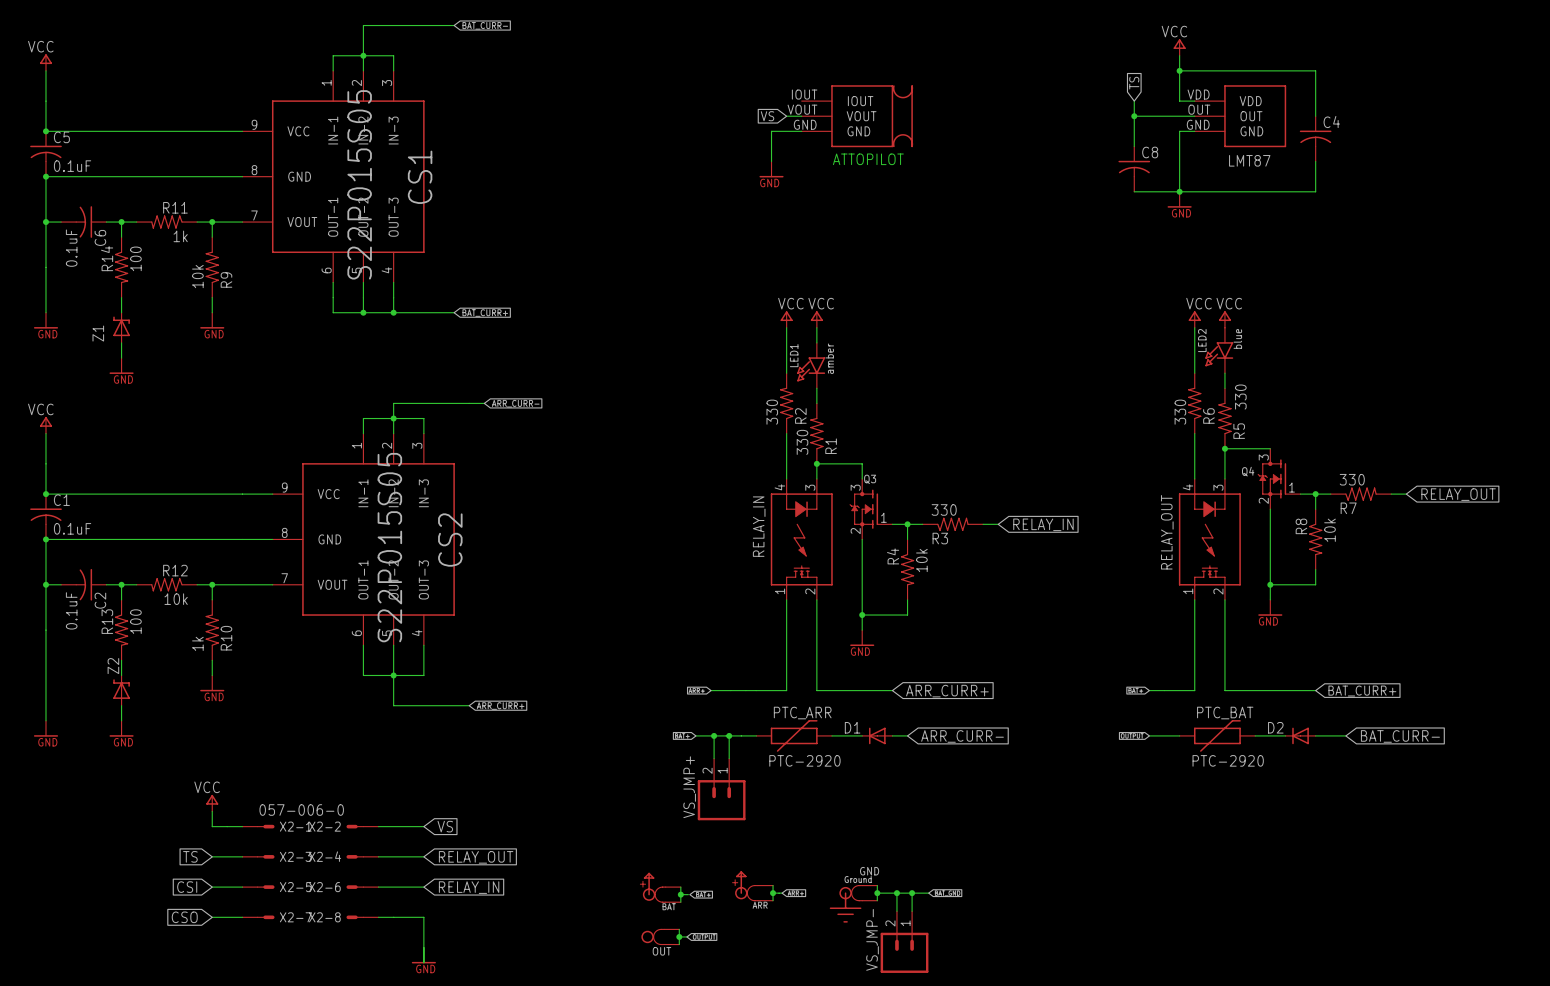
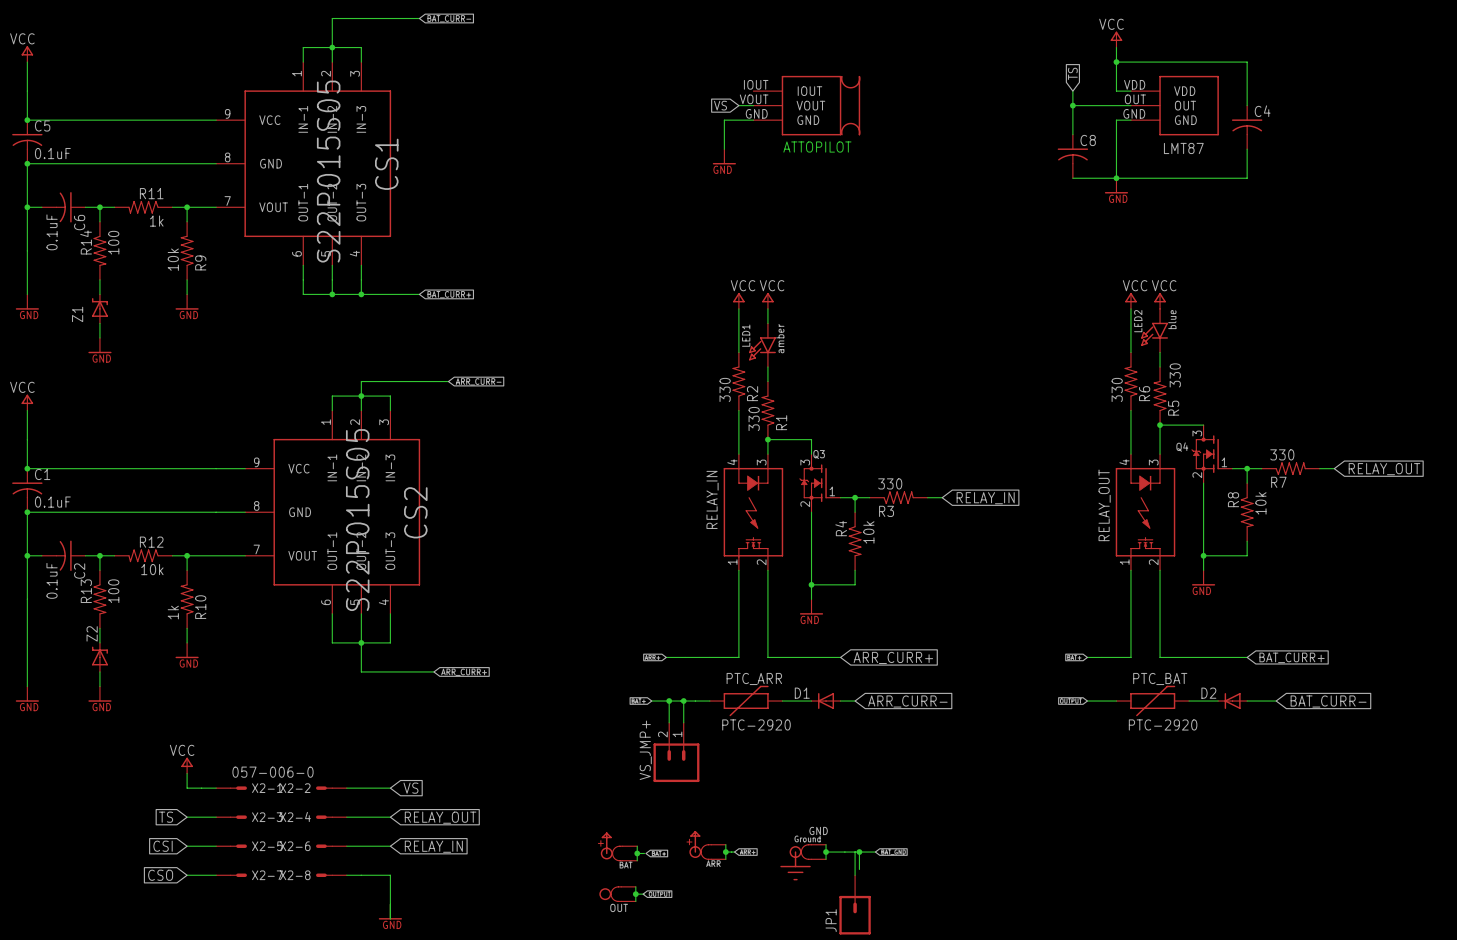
wire: (896, 893) (896, 911) -> none
junction: (896, 893) -> none
wire: none -> (855, 852) (855, 875)
VS_JMP-: (904, 942) -> none
JP1: none -> (855, 904)

